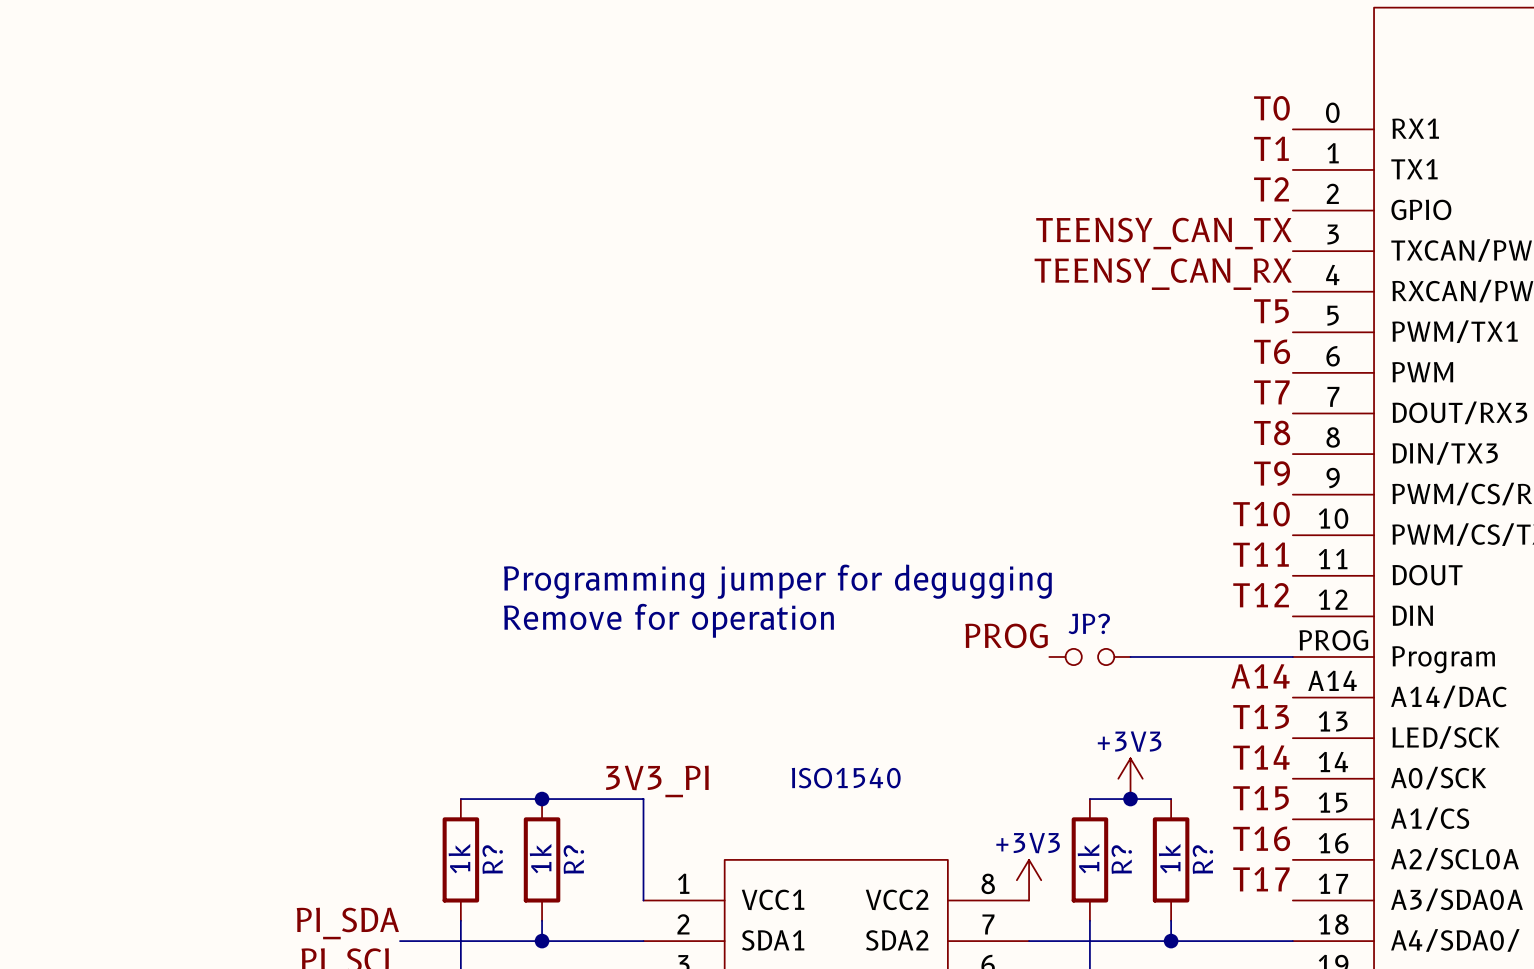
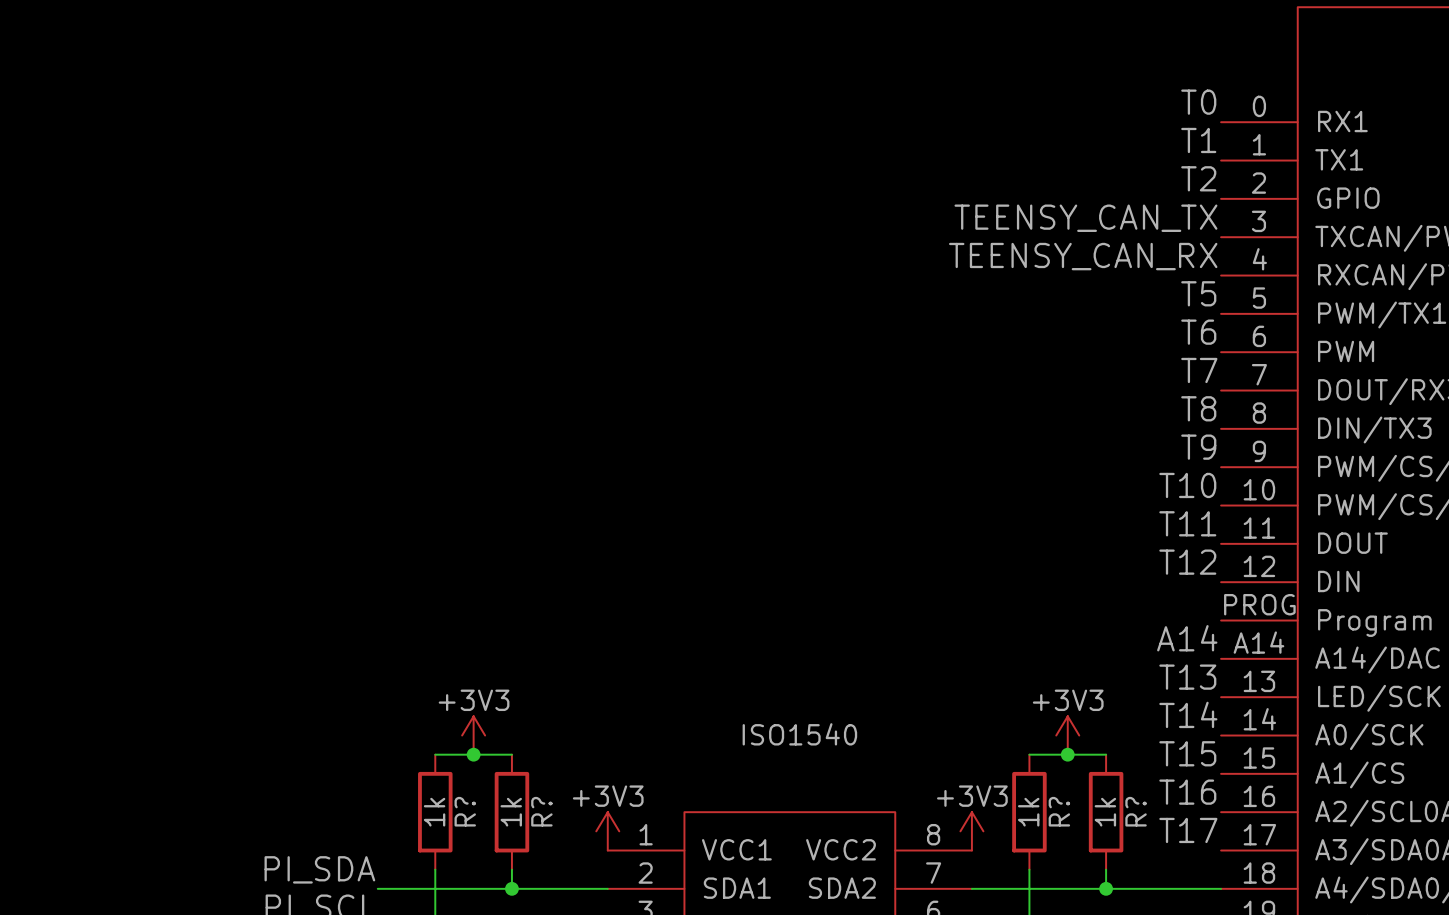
text: Programming jumper for degugging (777, 581) -> none
text: Remove for operation (668, 620) -> none
label: PROG (1006, 635) -> none
JP?: (1089, 656) -> none
wire: (1130, 656) (1292, 656) -> none
power symbol: none -> +3V3 (473, 735)
label: 3V3_PI (657, 781) -> none
wire: (542, 799) (643, 799) (643, 900) -> none
junction position: (542, 799) -> (473, 754)
power symbol: none -> +3V3 (607, 831)

